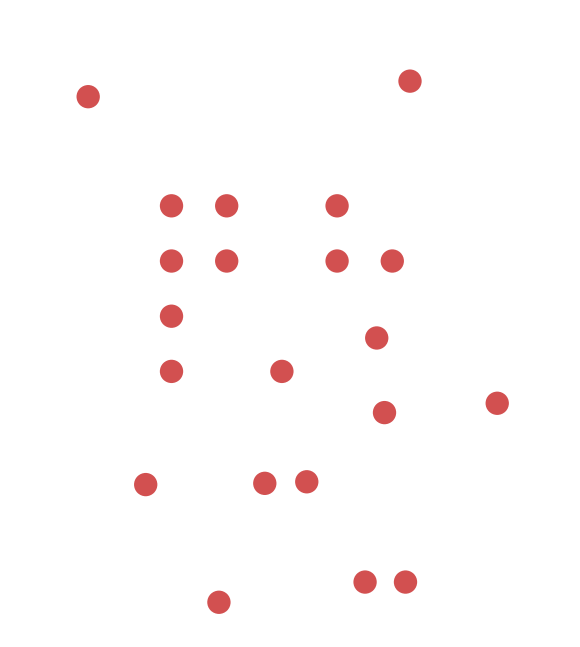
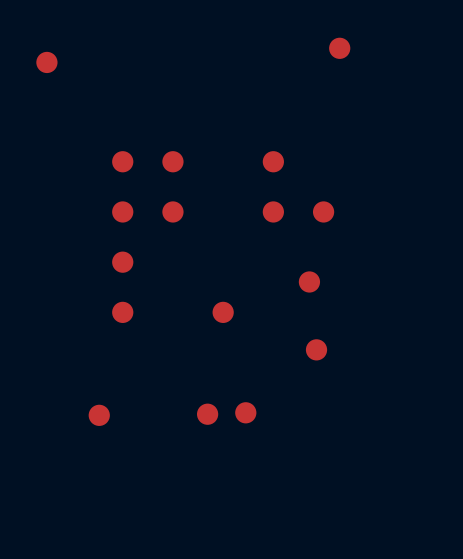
part: (497, 403) -> none
part: (365, 582) -> none
part: (405, 582) -> none
part: (218, 602) -> none

